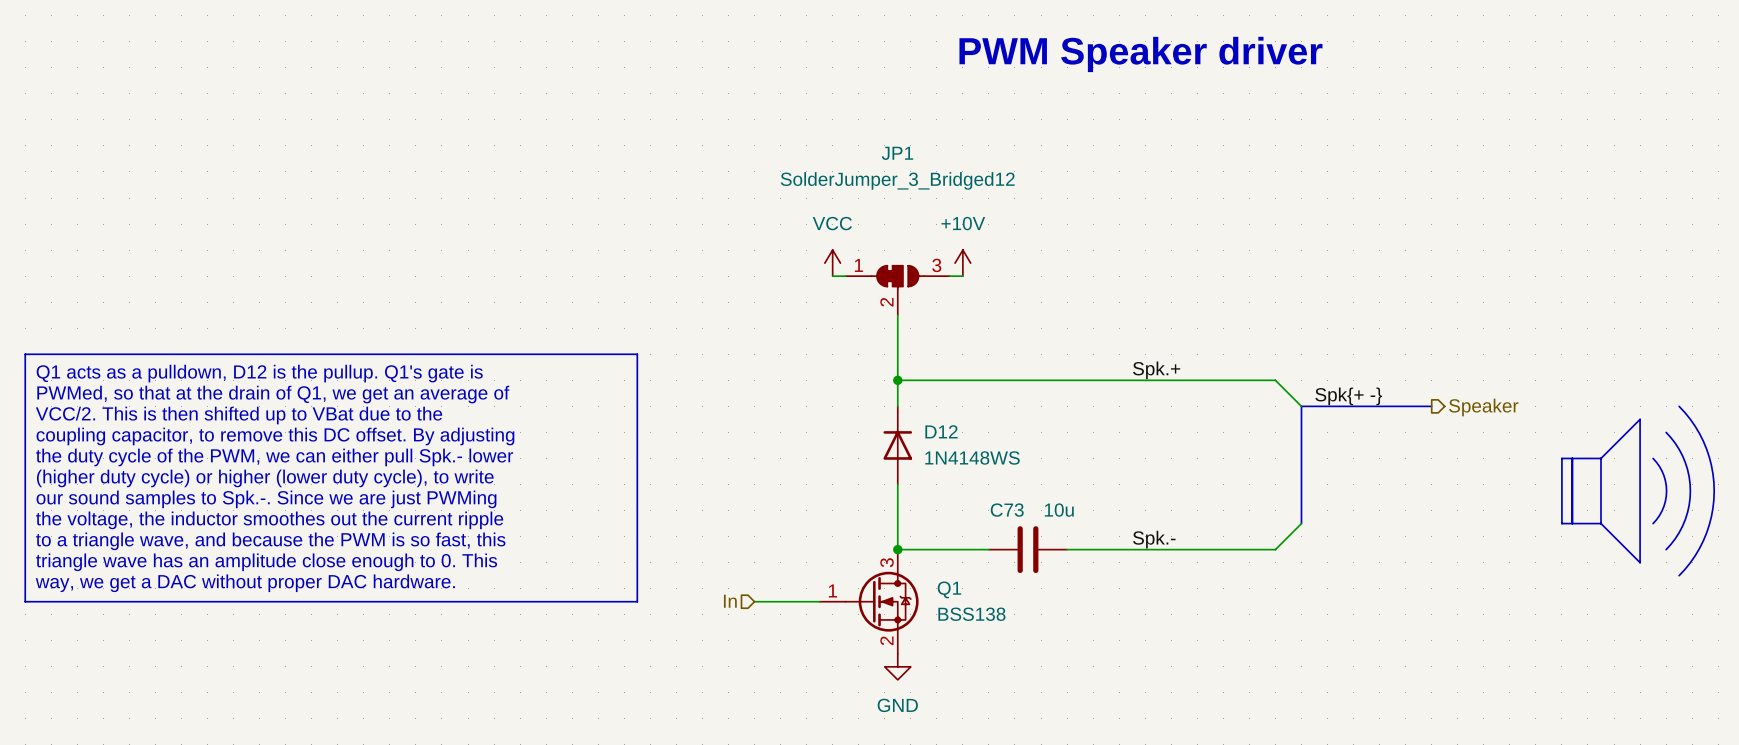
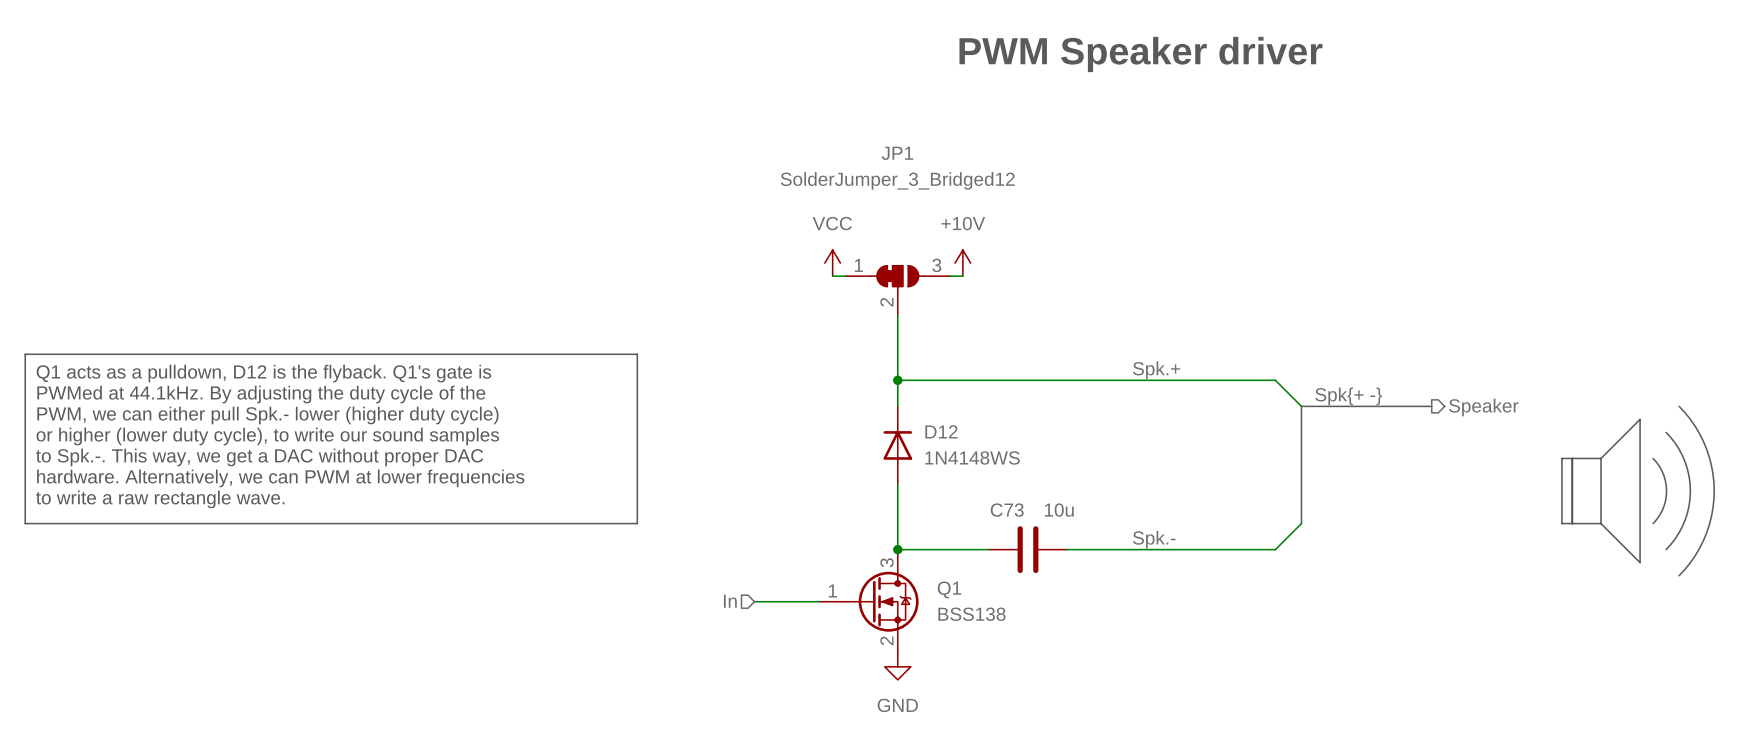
text: Q1 acts as a pulldown, D12 is the pullup. Q1's gate is (259, 373) -> Q1 acts as a pulldown, D12 is the flyback. Q1's gate is (263, 373)
text: PWMed, so that at the drain of Q1, we get an average of (273, 394) -> PWMed at 44.1kHz. By adjusting the duty cycle of the (261, 394)
text: VCC/2. This is then shifted up to VBat due to the (239, 415) -> PWM, we can either pull Spk.- lower (higher duty cycle) (267, 415)
text: coupling capacitor, to remove this DC offset. By adjusting (275, 436) -> or higher (lower duty cycle), to write our sound samples (267, 436)
text: the duty cycle of the PWM, we can either pull Spk.- lower (274, 457) -> to Spk.-. This way, we get a DAC without proper DAC (259, 457)
text: (higher duty cycle) or higher (lower duty cycle), to write (265, 478) -> hardware. Alternatively, we can PWM at lower frequencies (280, 478)
text: our sound samples to Spk.-. Since we are just PWMing (266, 499) -> to write a raw rectangle wave. (160, 499)
text: the voltage, the inductor smoothes out the current ripple (269, 520) -> none
line: (25, 523) (25, 601) (637, 601) (637, 523) -> (25, 523) (637, 523)
text: to a triangle wave, and because the PWM is so fast, this (270, 541) -> none
text: triangle wave has an amplitude close enough to 0. This (266, 562) -> none
text: way, we get a DAC without proper DAC hardware. (245, 583) -> none

